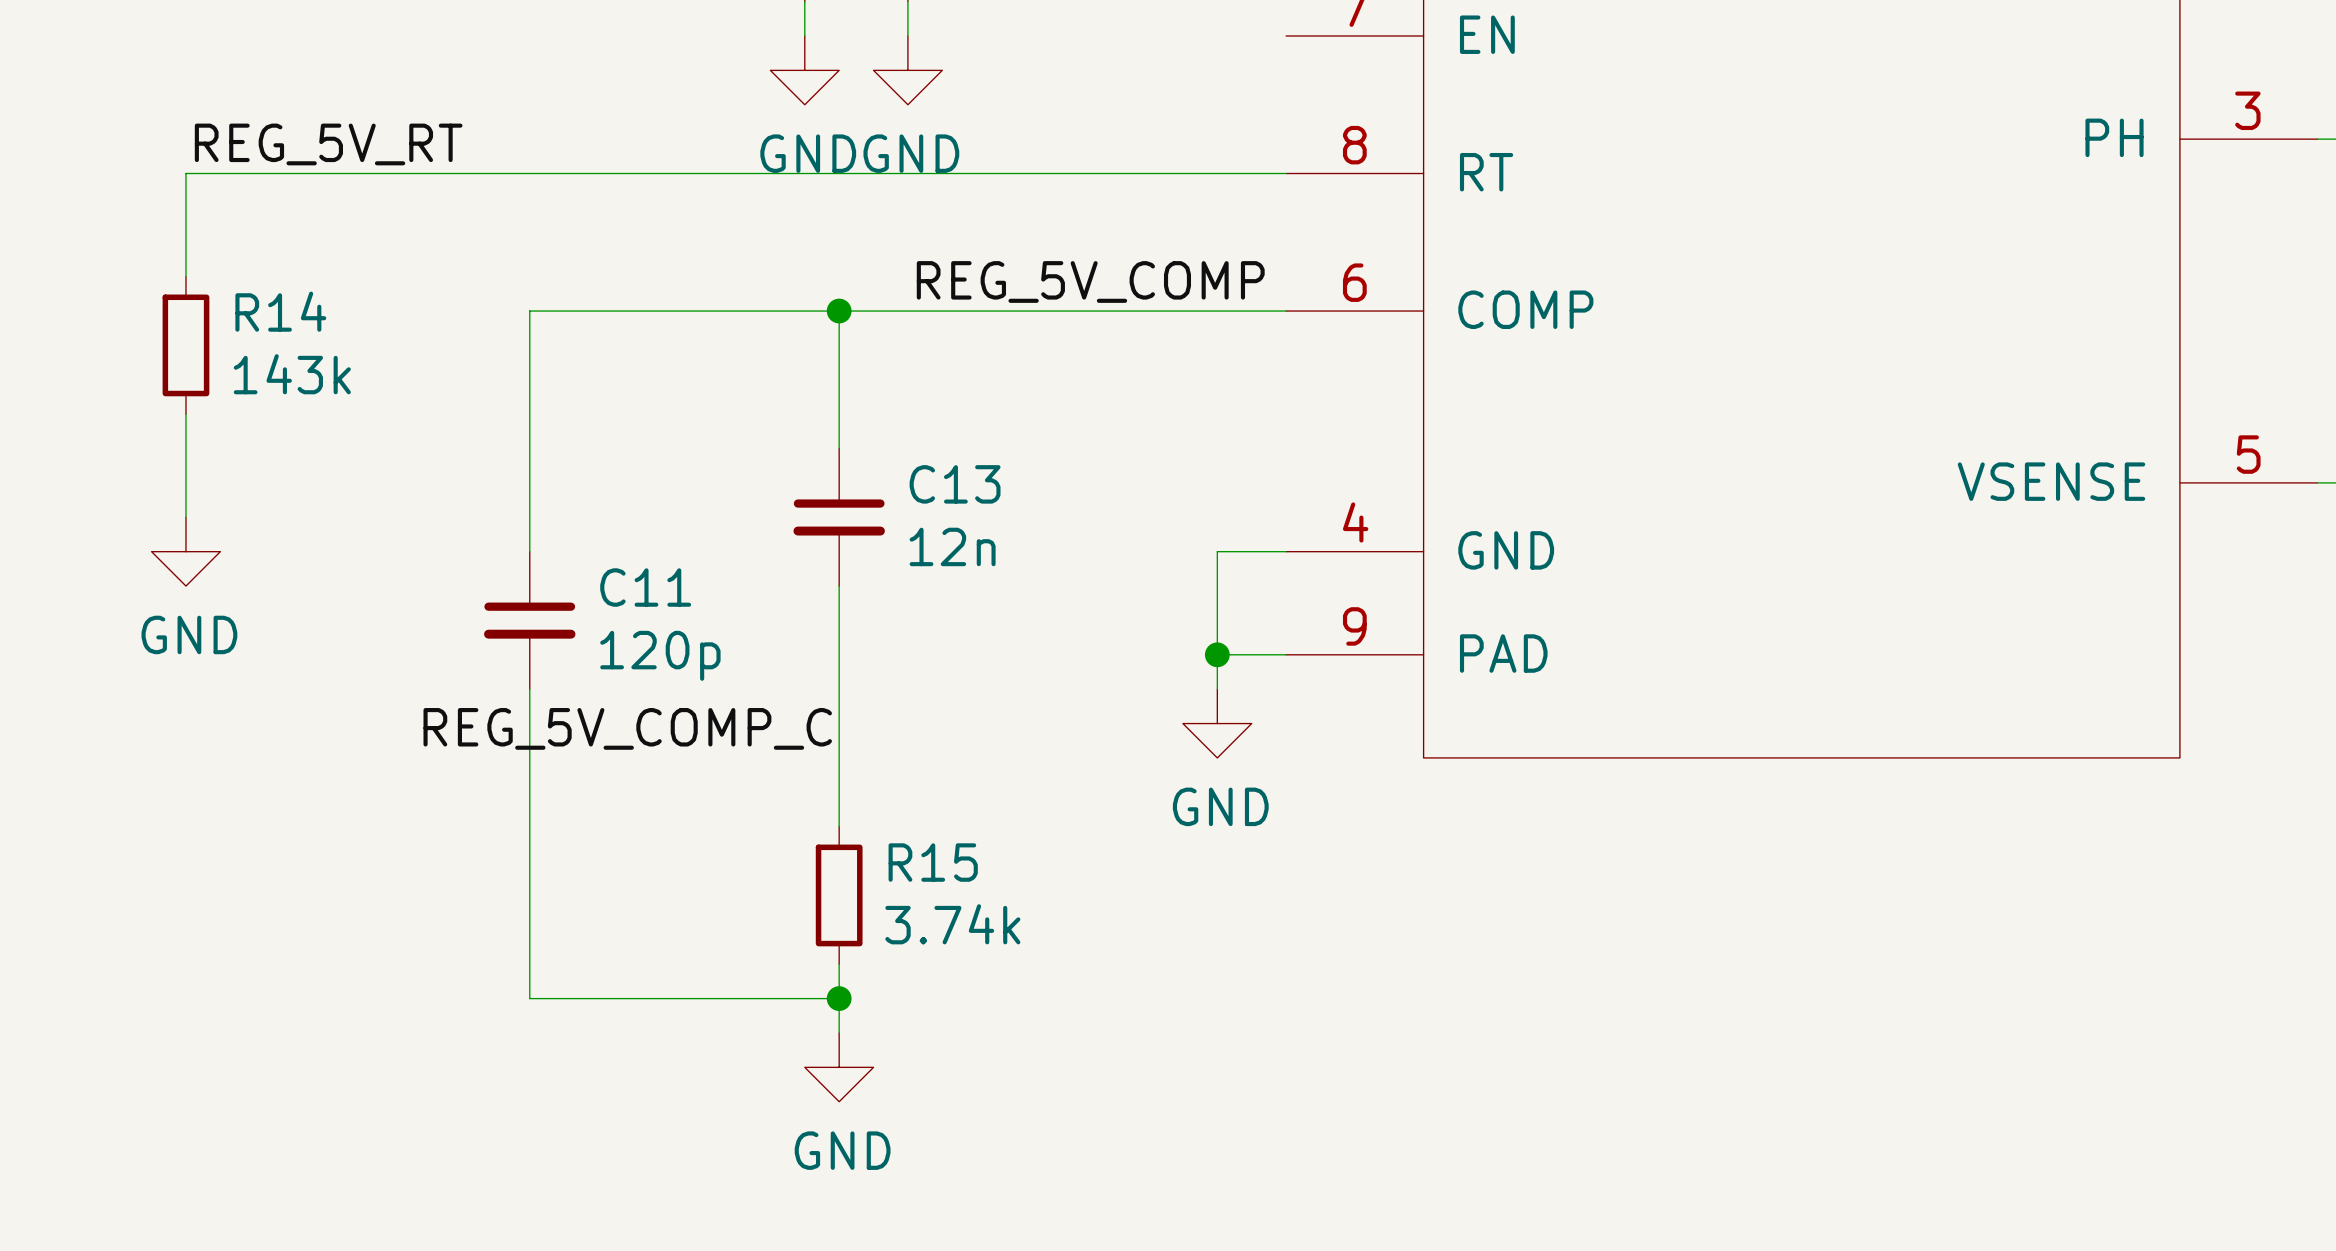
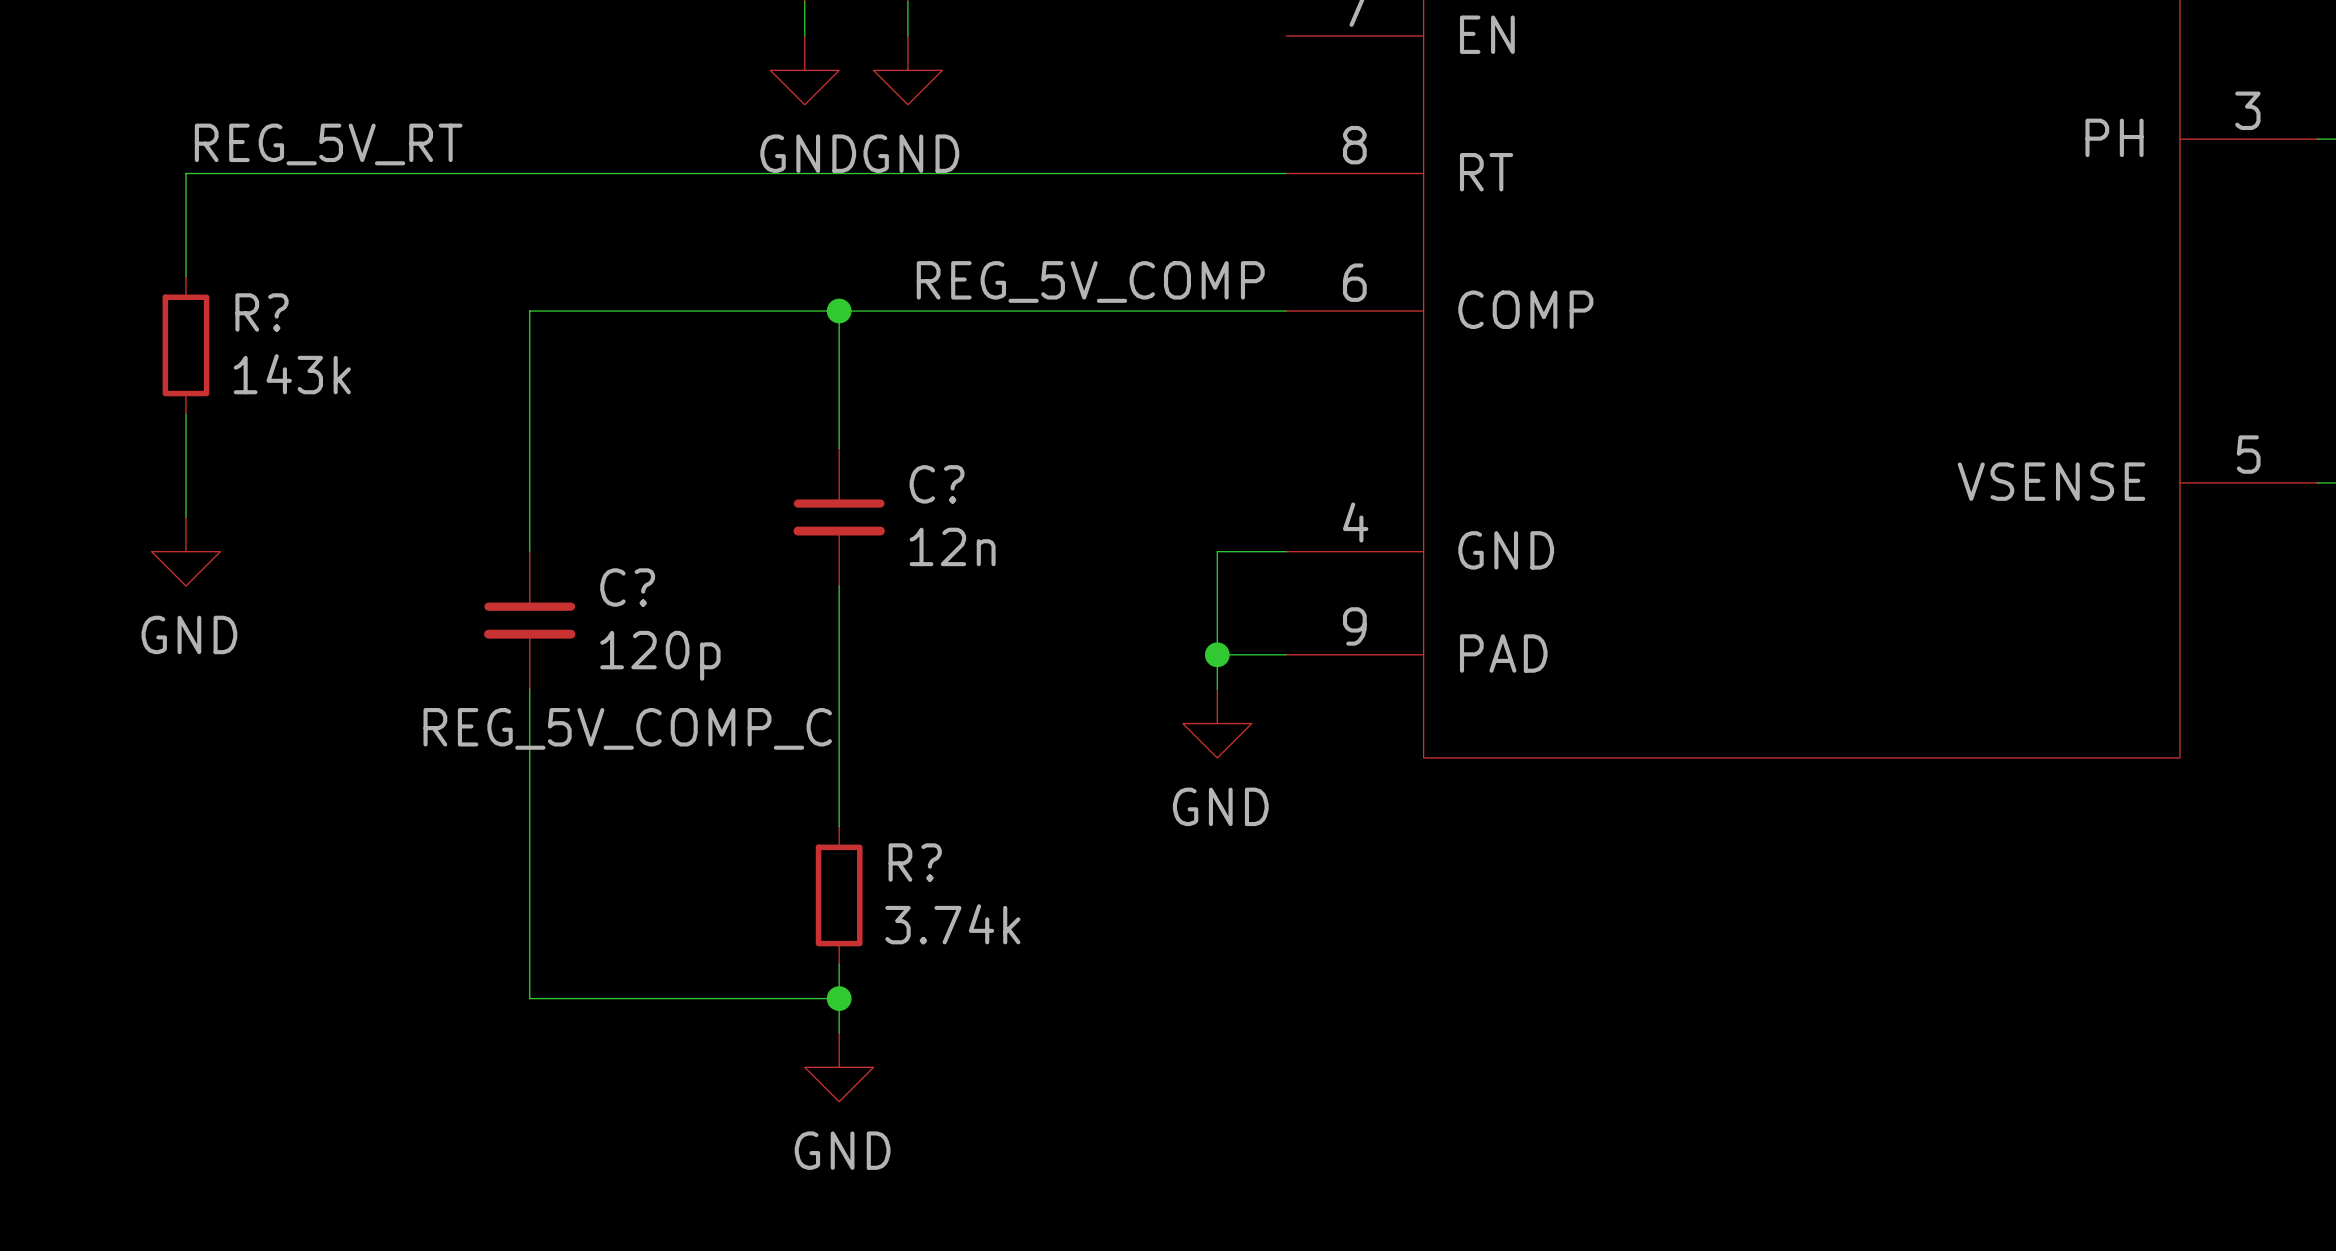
R14 name: R14 (280, 311) -> R? (262, 312)
C13 name: C13 (955, 484) -> C? (937, 484)
C11 name: C11 (645, 587) -> C? (627, 587)
R15 name: R15 (933, 862) -> R? (915, 862)

